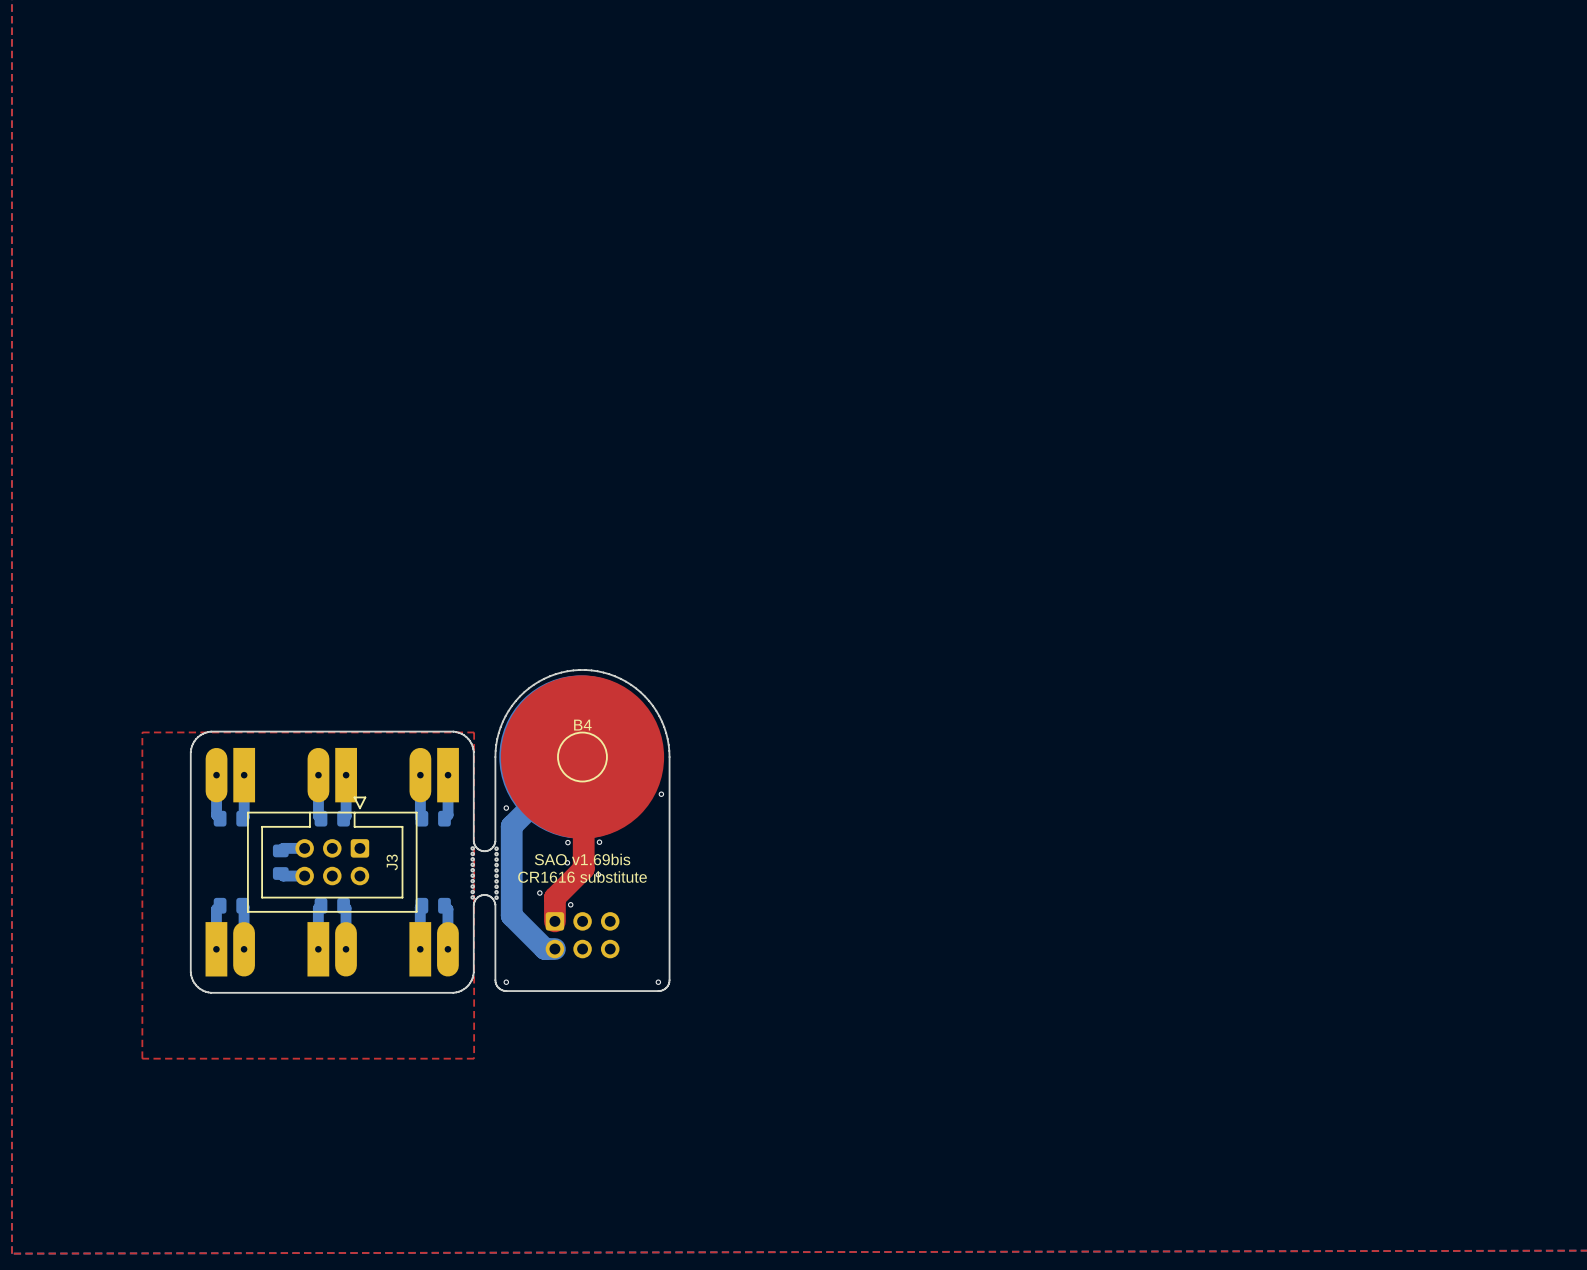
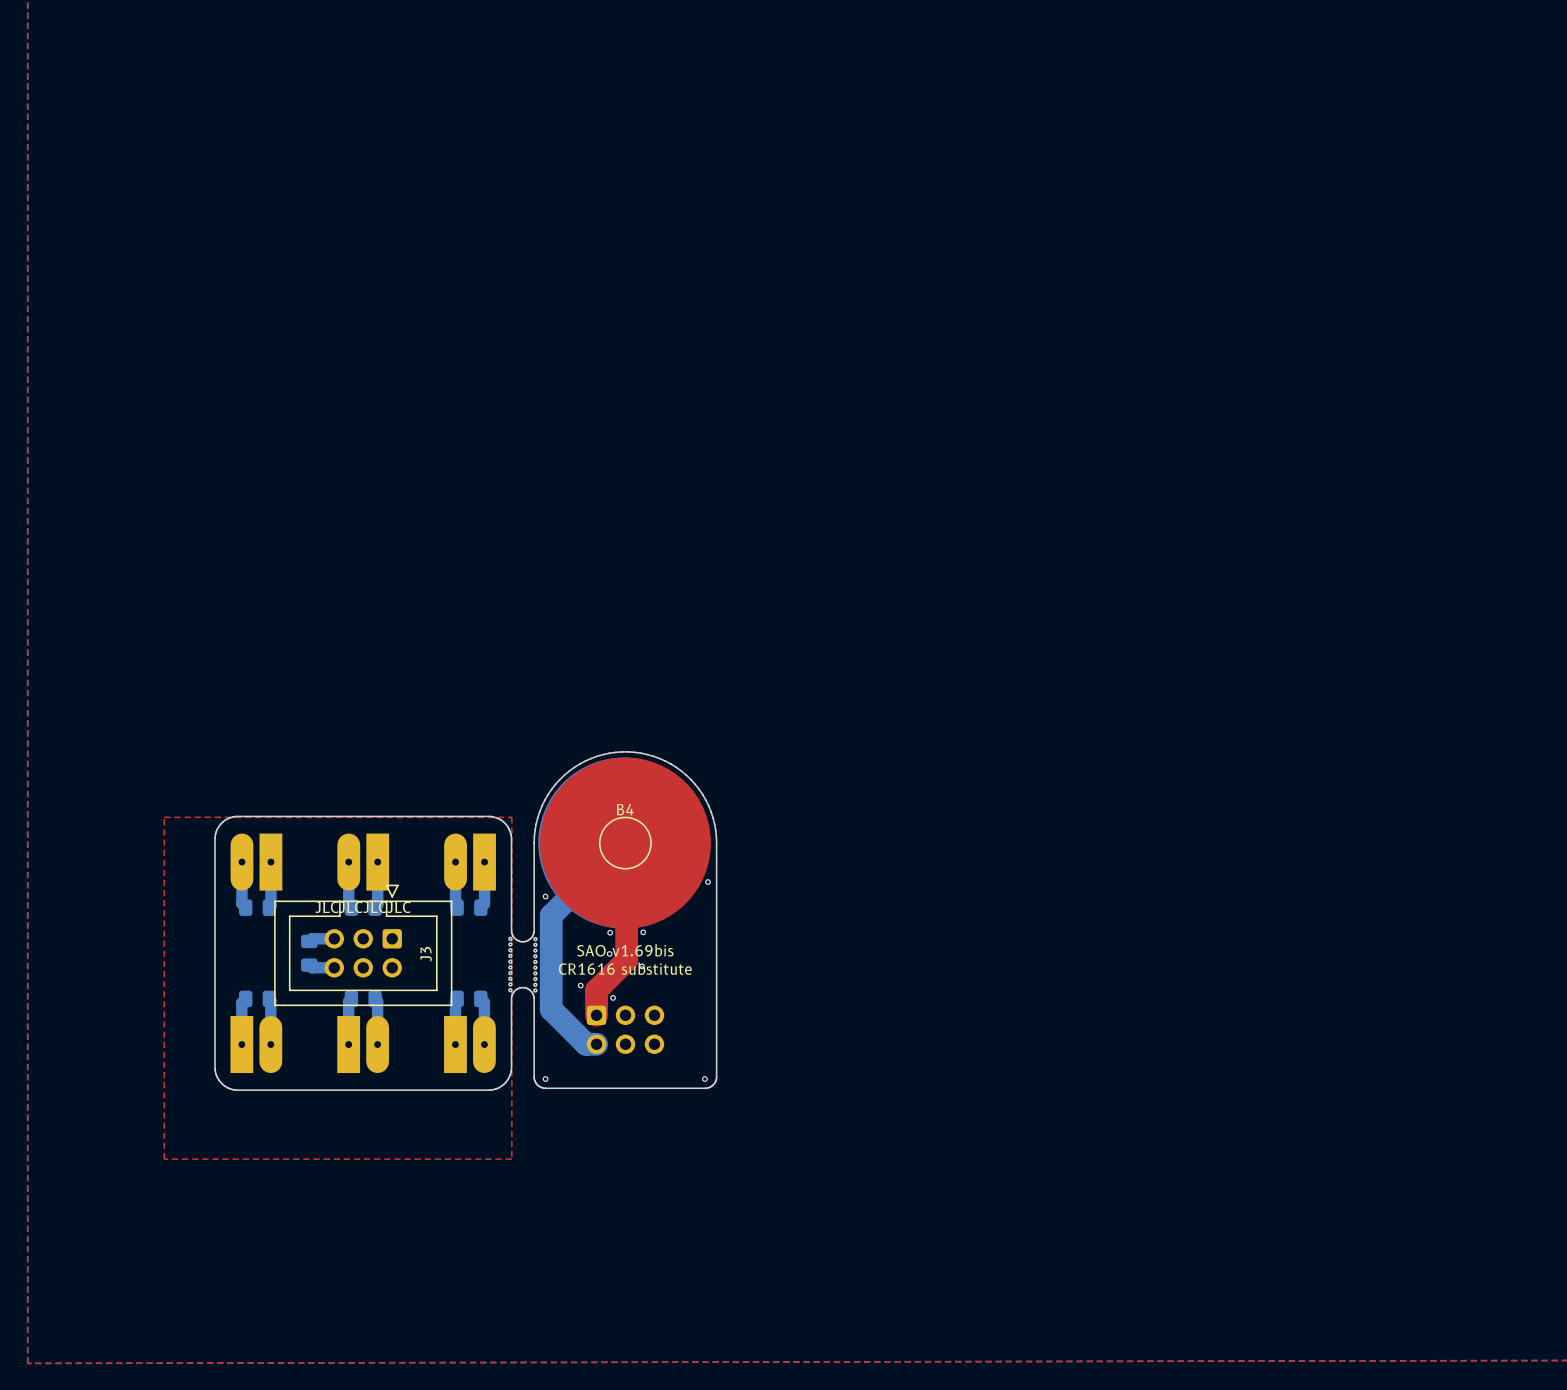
text: none -> JLCJLCJLCJLC (362, 907)

